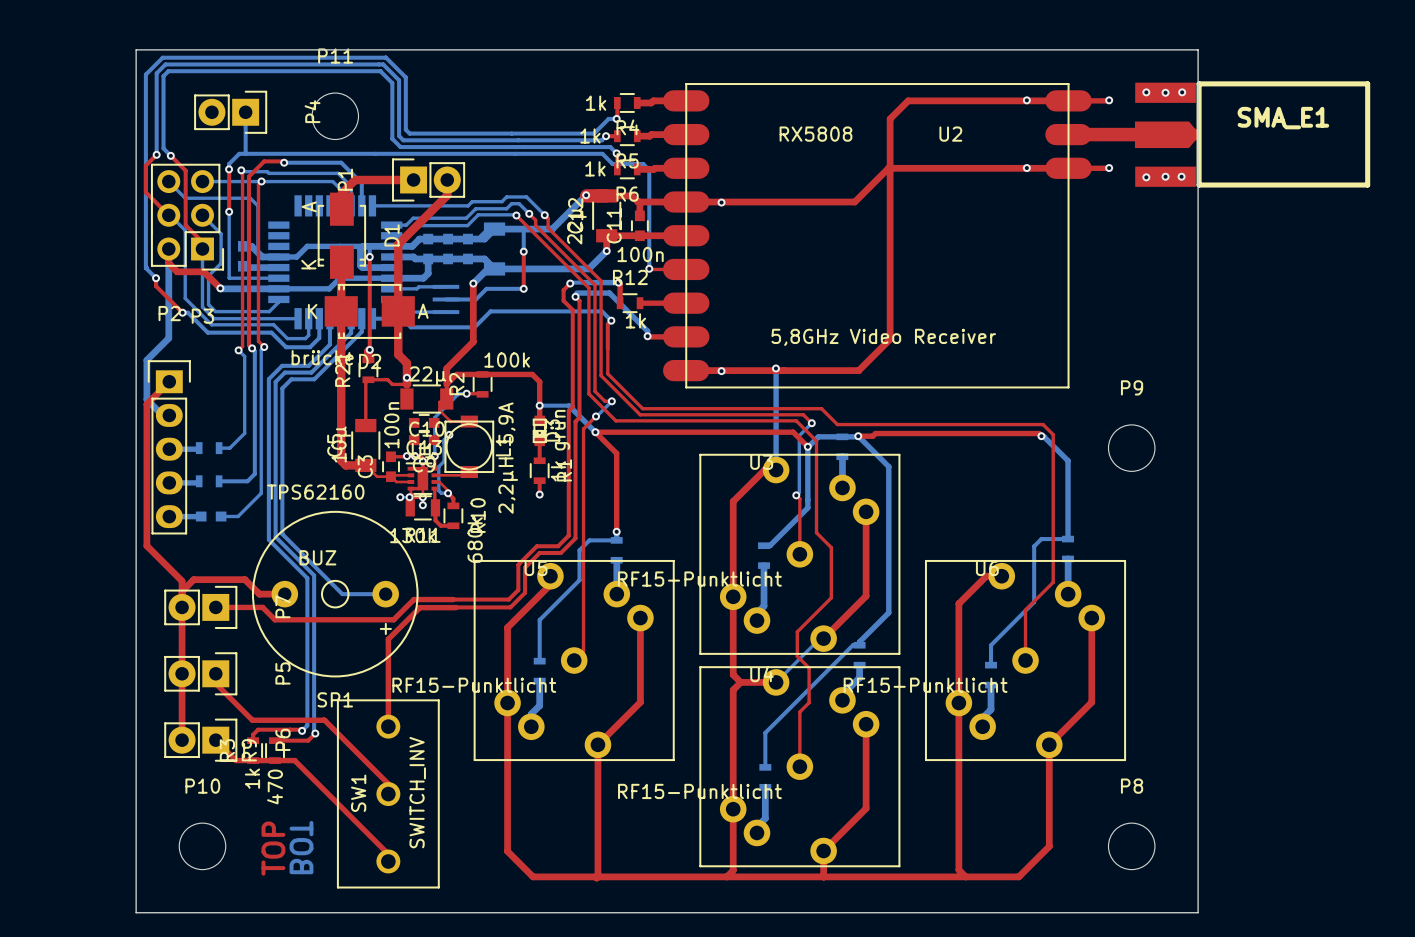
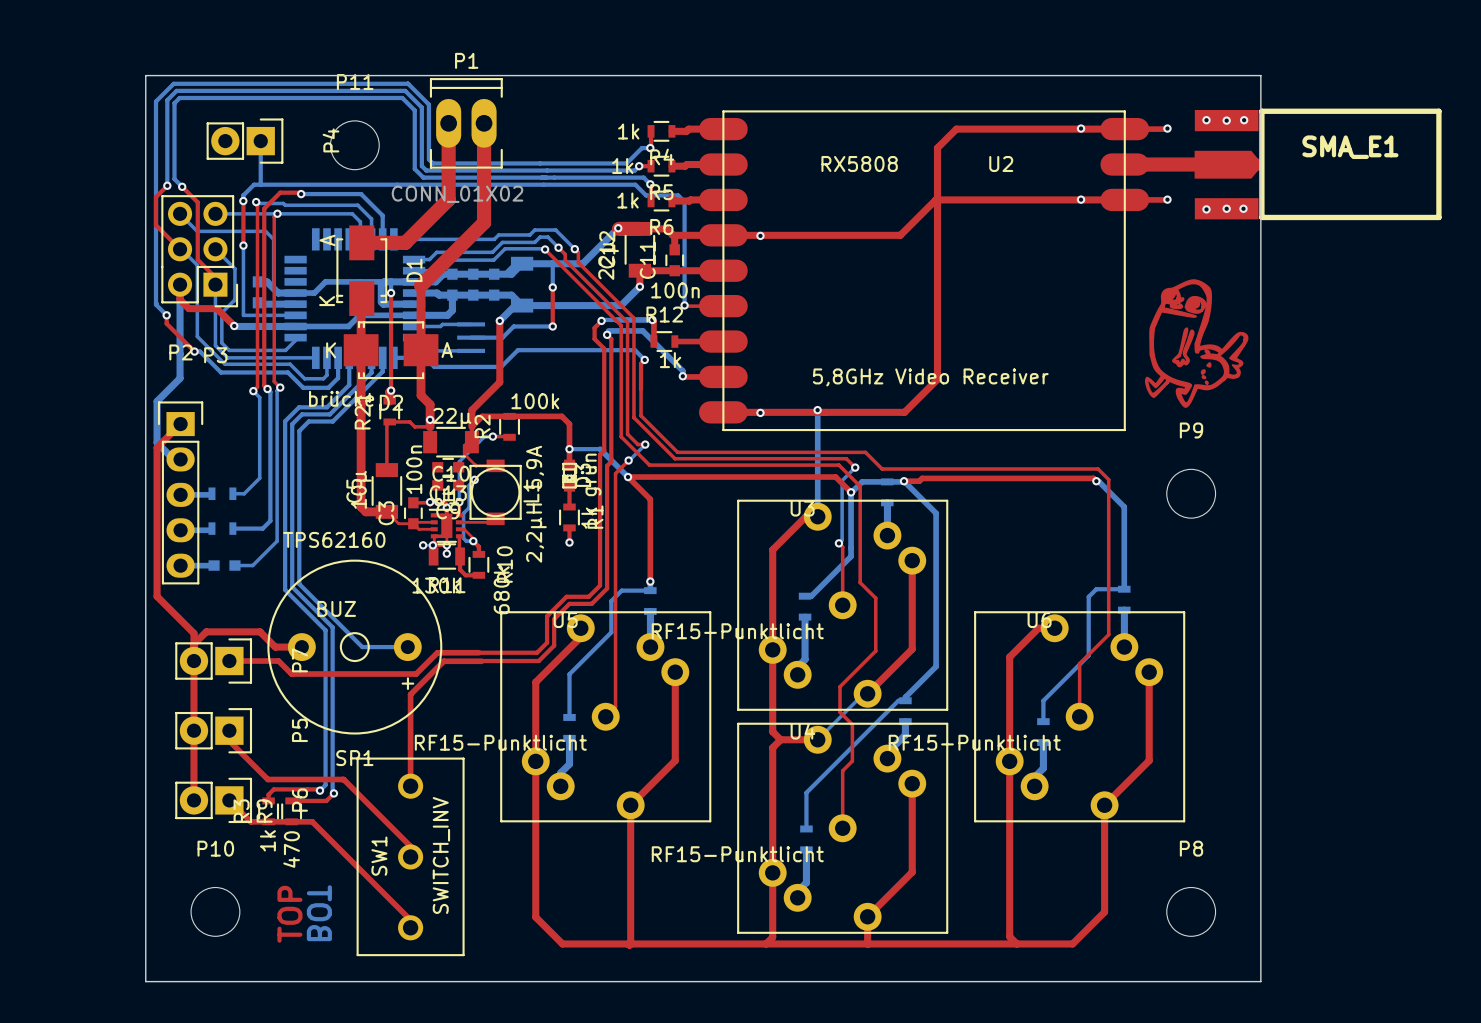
top track: none -> (448, 123) (448, 199) (405, 242) (361, 242)
P1 footprint: [392, 158, 466, 202] -> [429, 78, 503, 169]
P1 value: none -> CONN_01X02 (457, 194)
P1 name position: P1 (345, 179) -> P1 (466, 60)
top track: (413, 179) (355, 179) (341, 193) (341, 208) -> none
top track: (447, 179) (447, 195) (398, 244) (398, 250) -> (484, 123) (484, 222) (421, 285)
drawing: none -> [1144, 279, 1249, 408]

